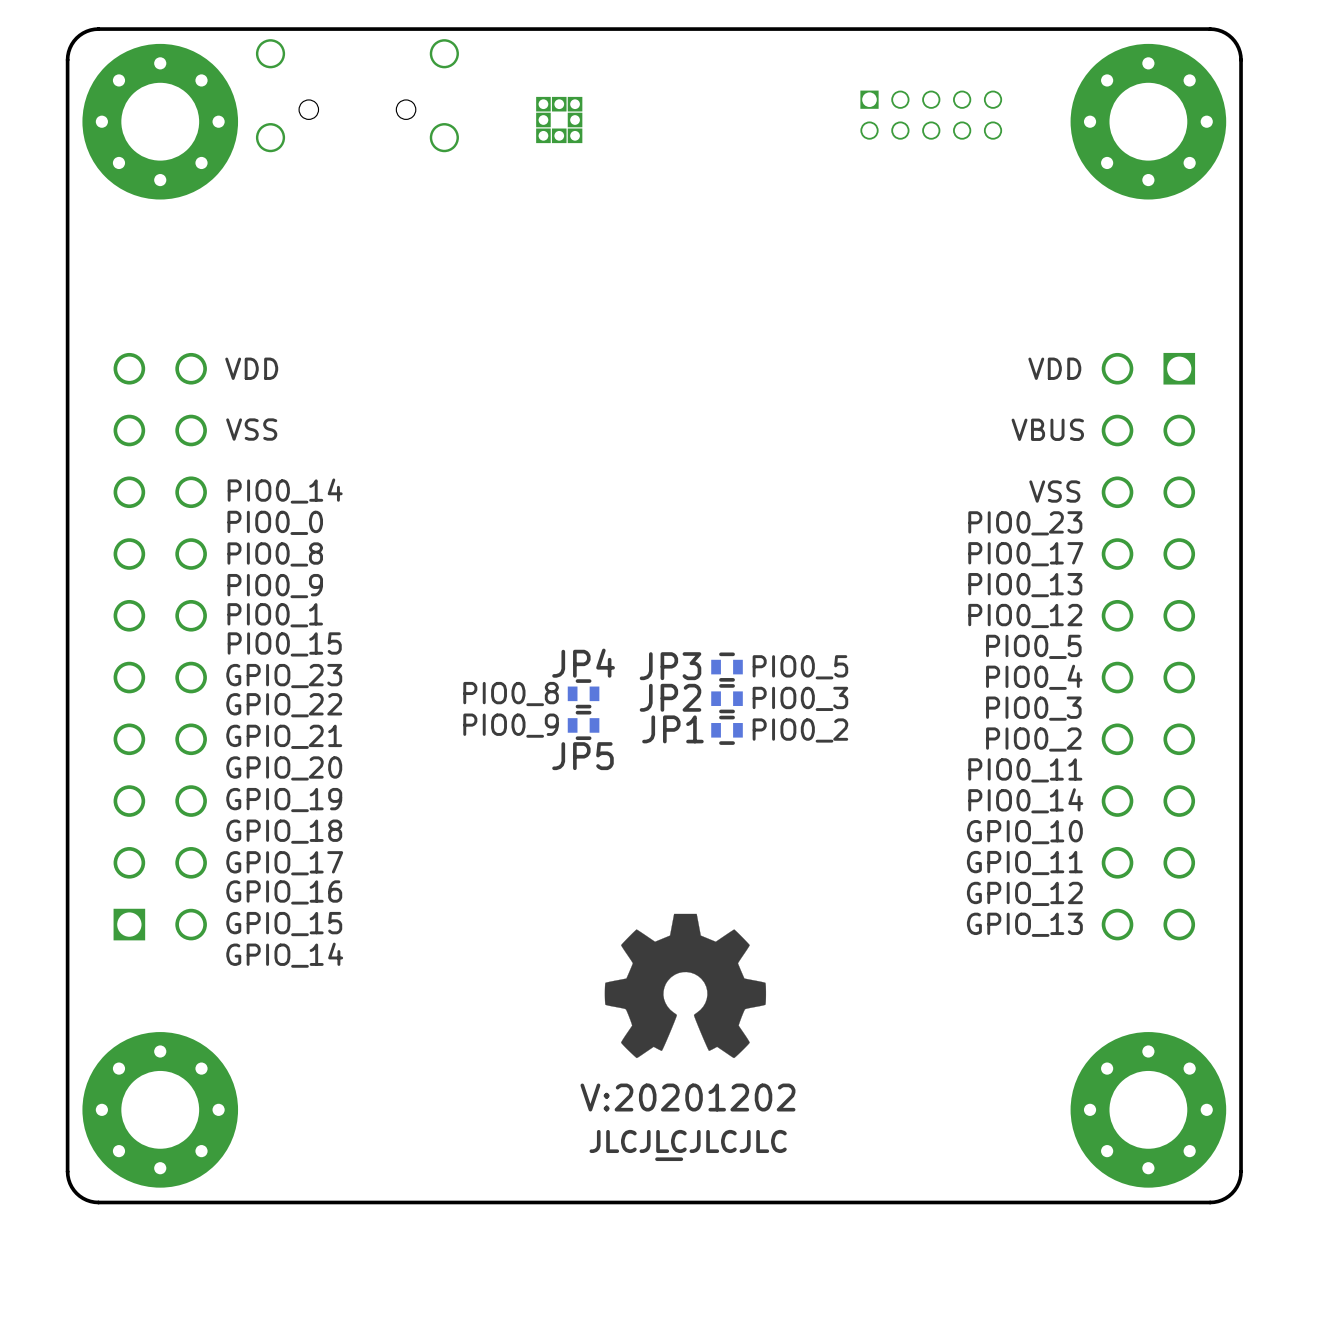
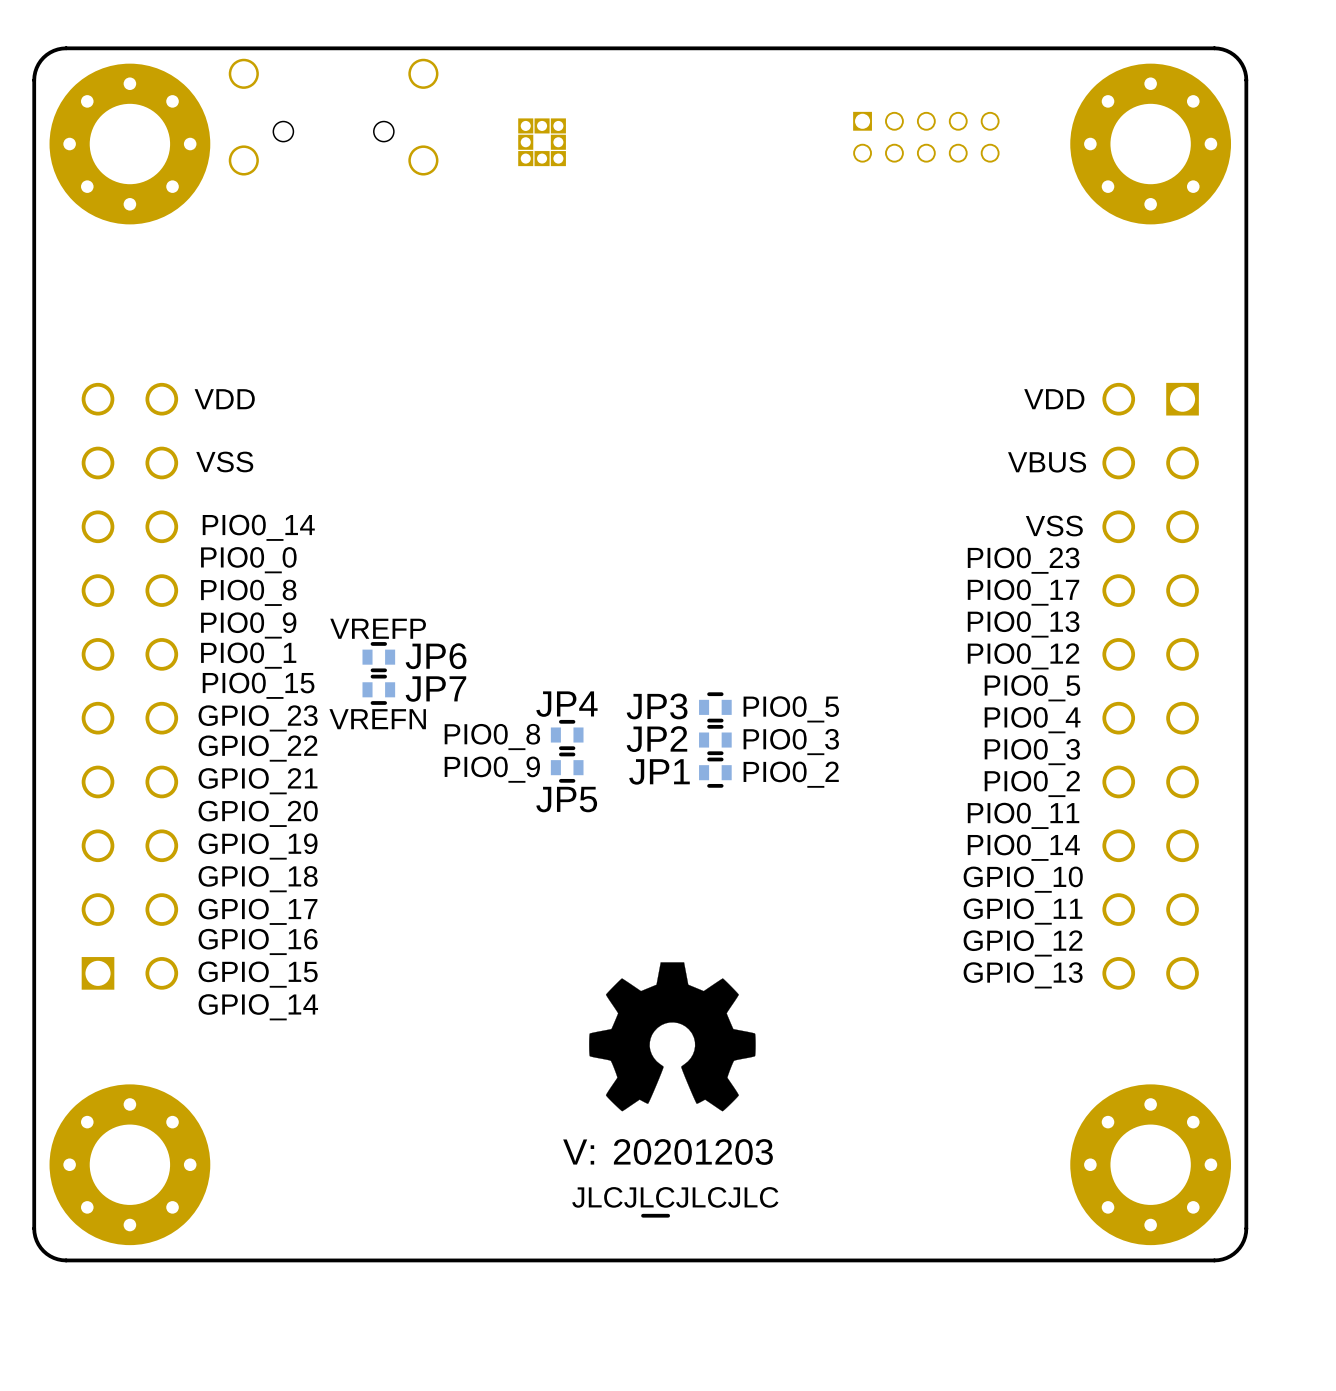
JP6: none -> VREFP (378, 657)
JP7: none -> VREFN (378, 689)
drawing shape: [580, 1083, 796, 1112] -> [563, 1139, 773, 1165]

